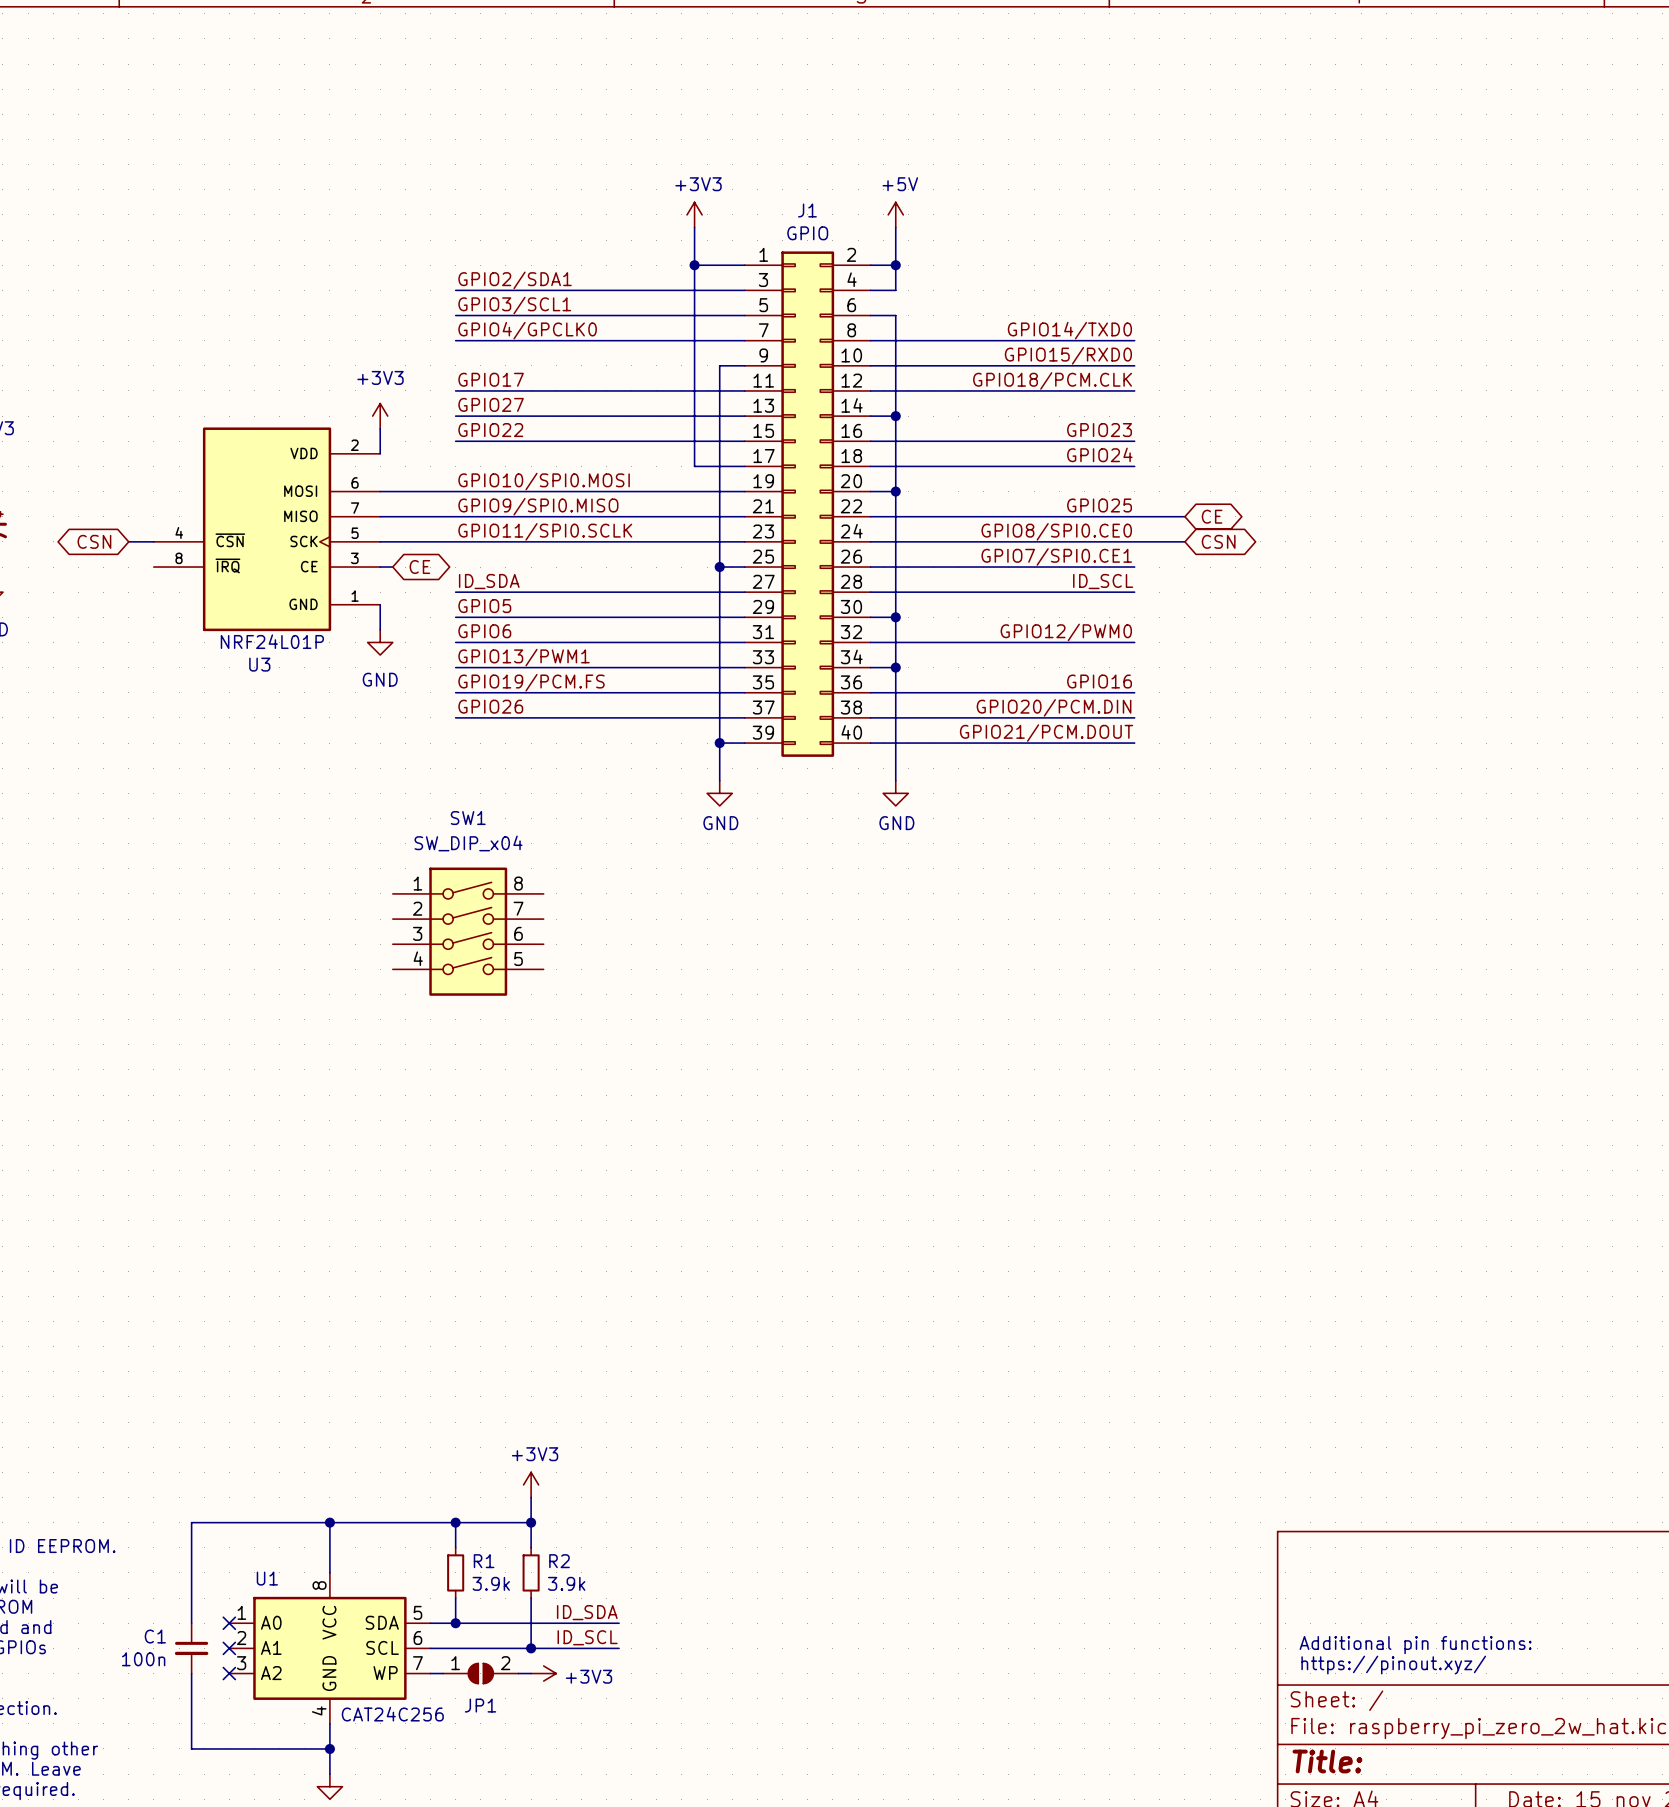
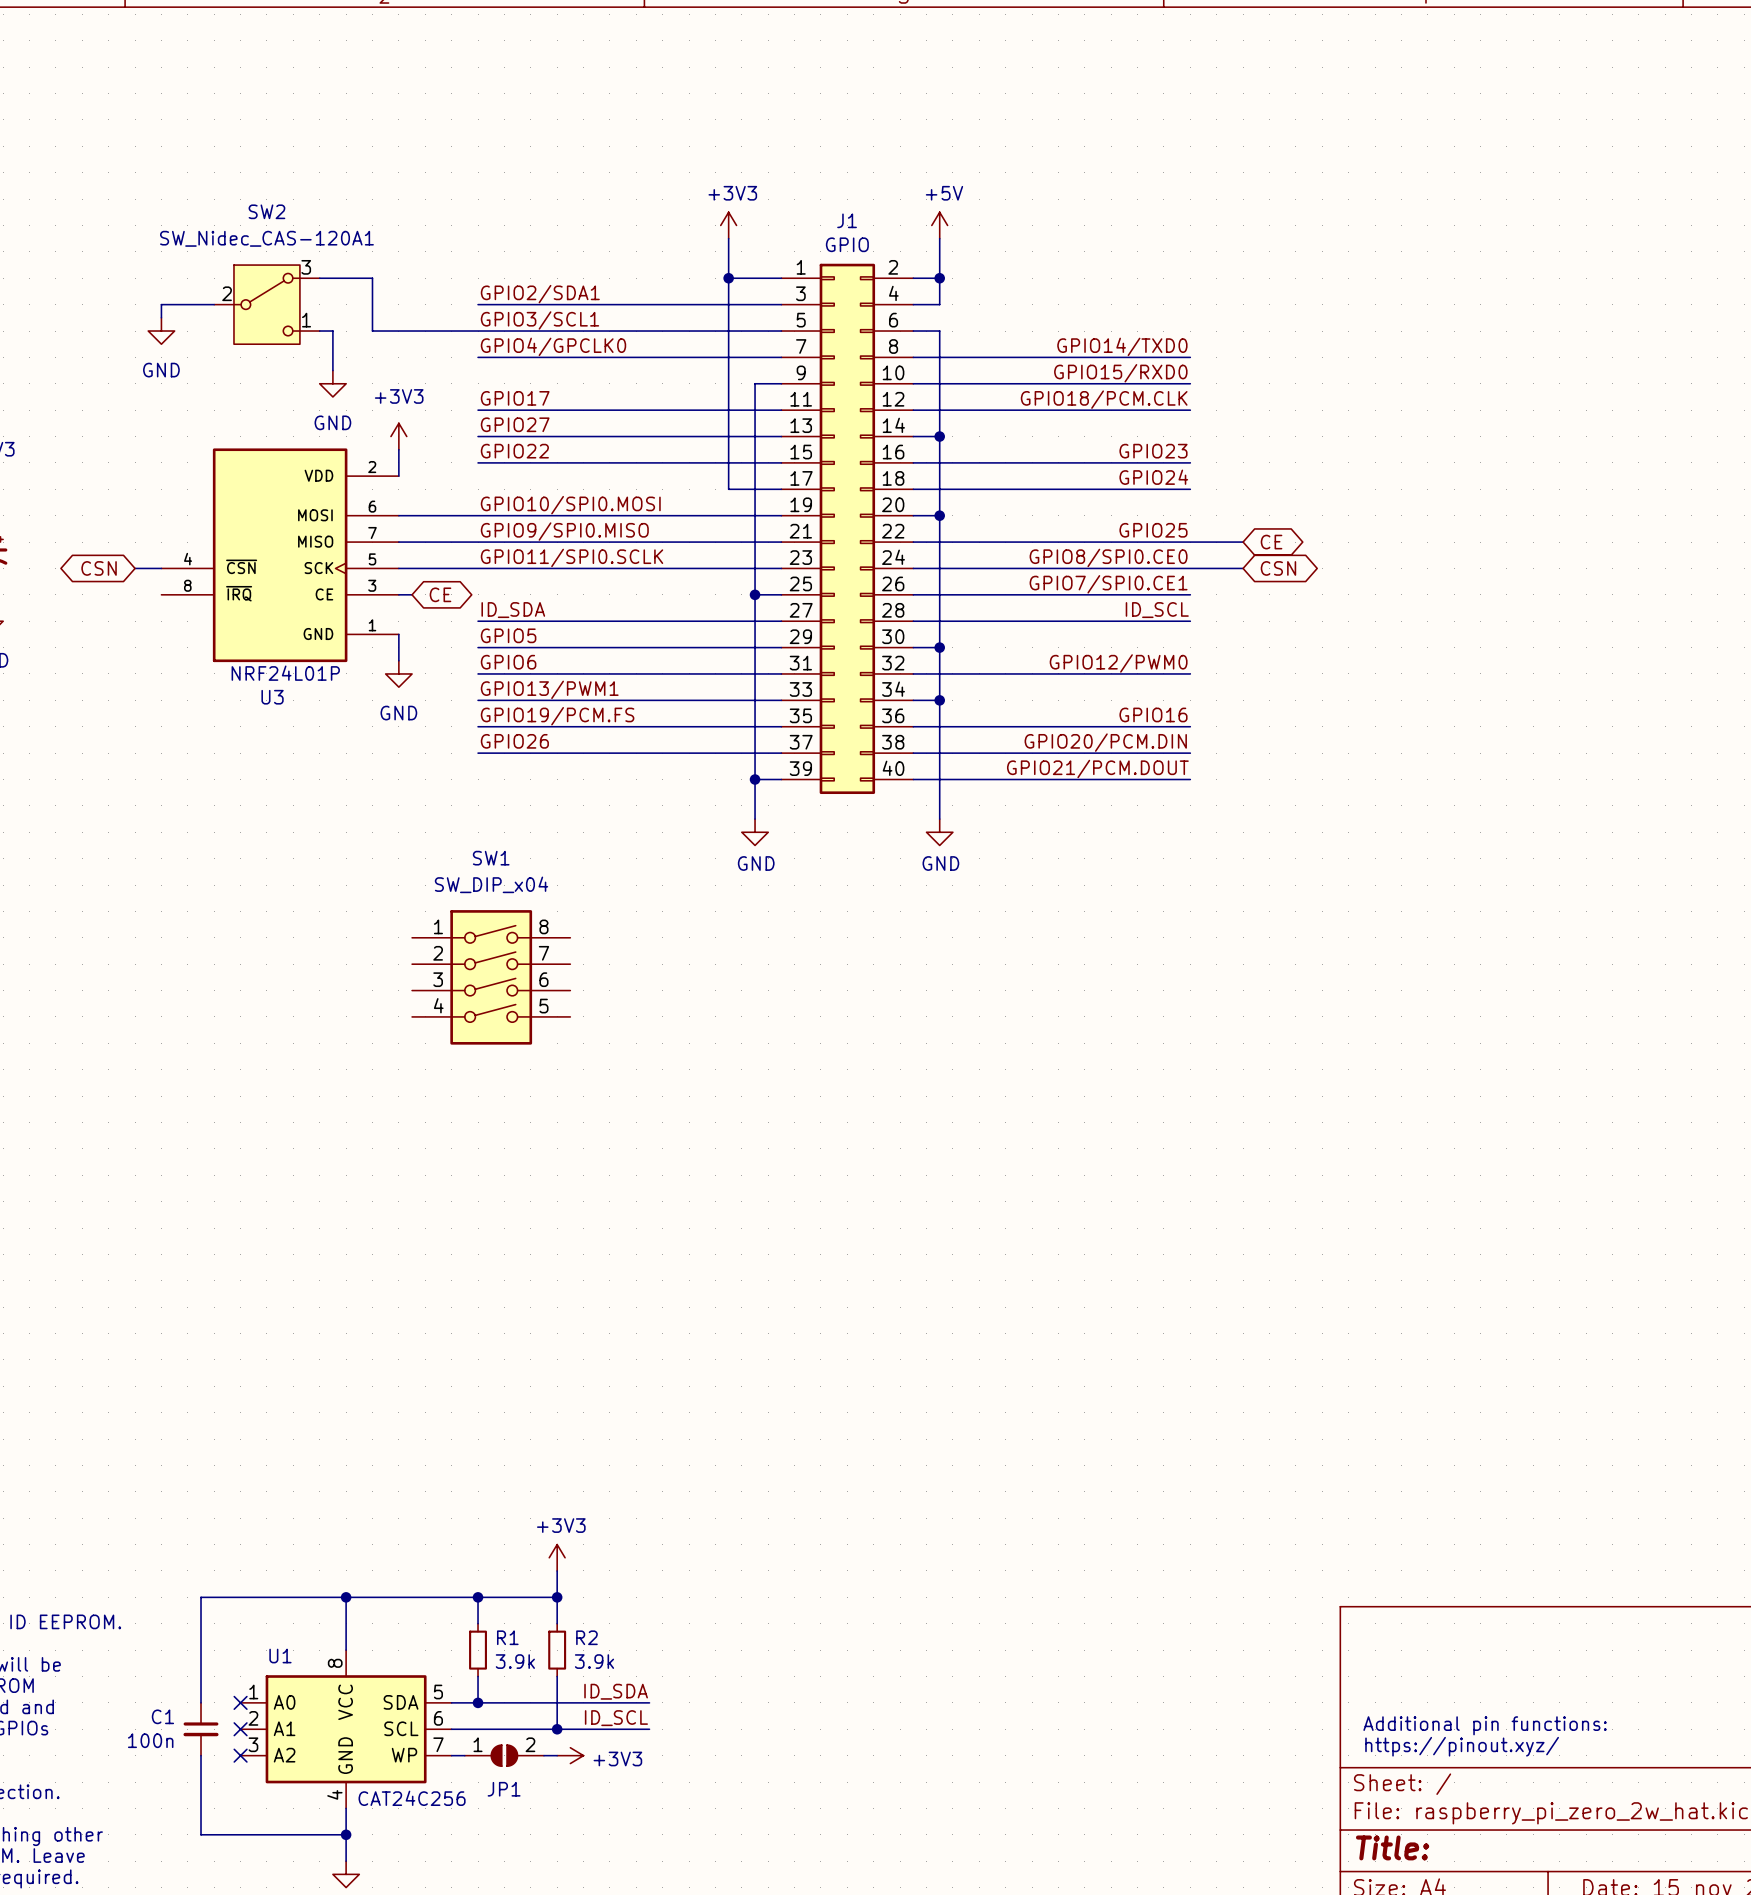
wire: none -> (319, 278) (372, 278) (372, 331) (478, 331)
wire: none -> (214, 304) (161, 304) (161, 317)
SW2: none -> SW_Nidec_CAS-120A1 (266, 304)
power symbol: none -> GND (161, 331)
wire: none -> (319, 331) (332, 331) (332, 370)
power symbol: none -> GND (332, 383)

